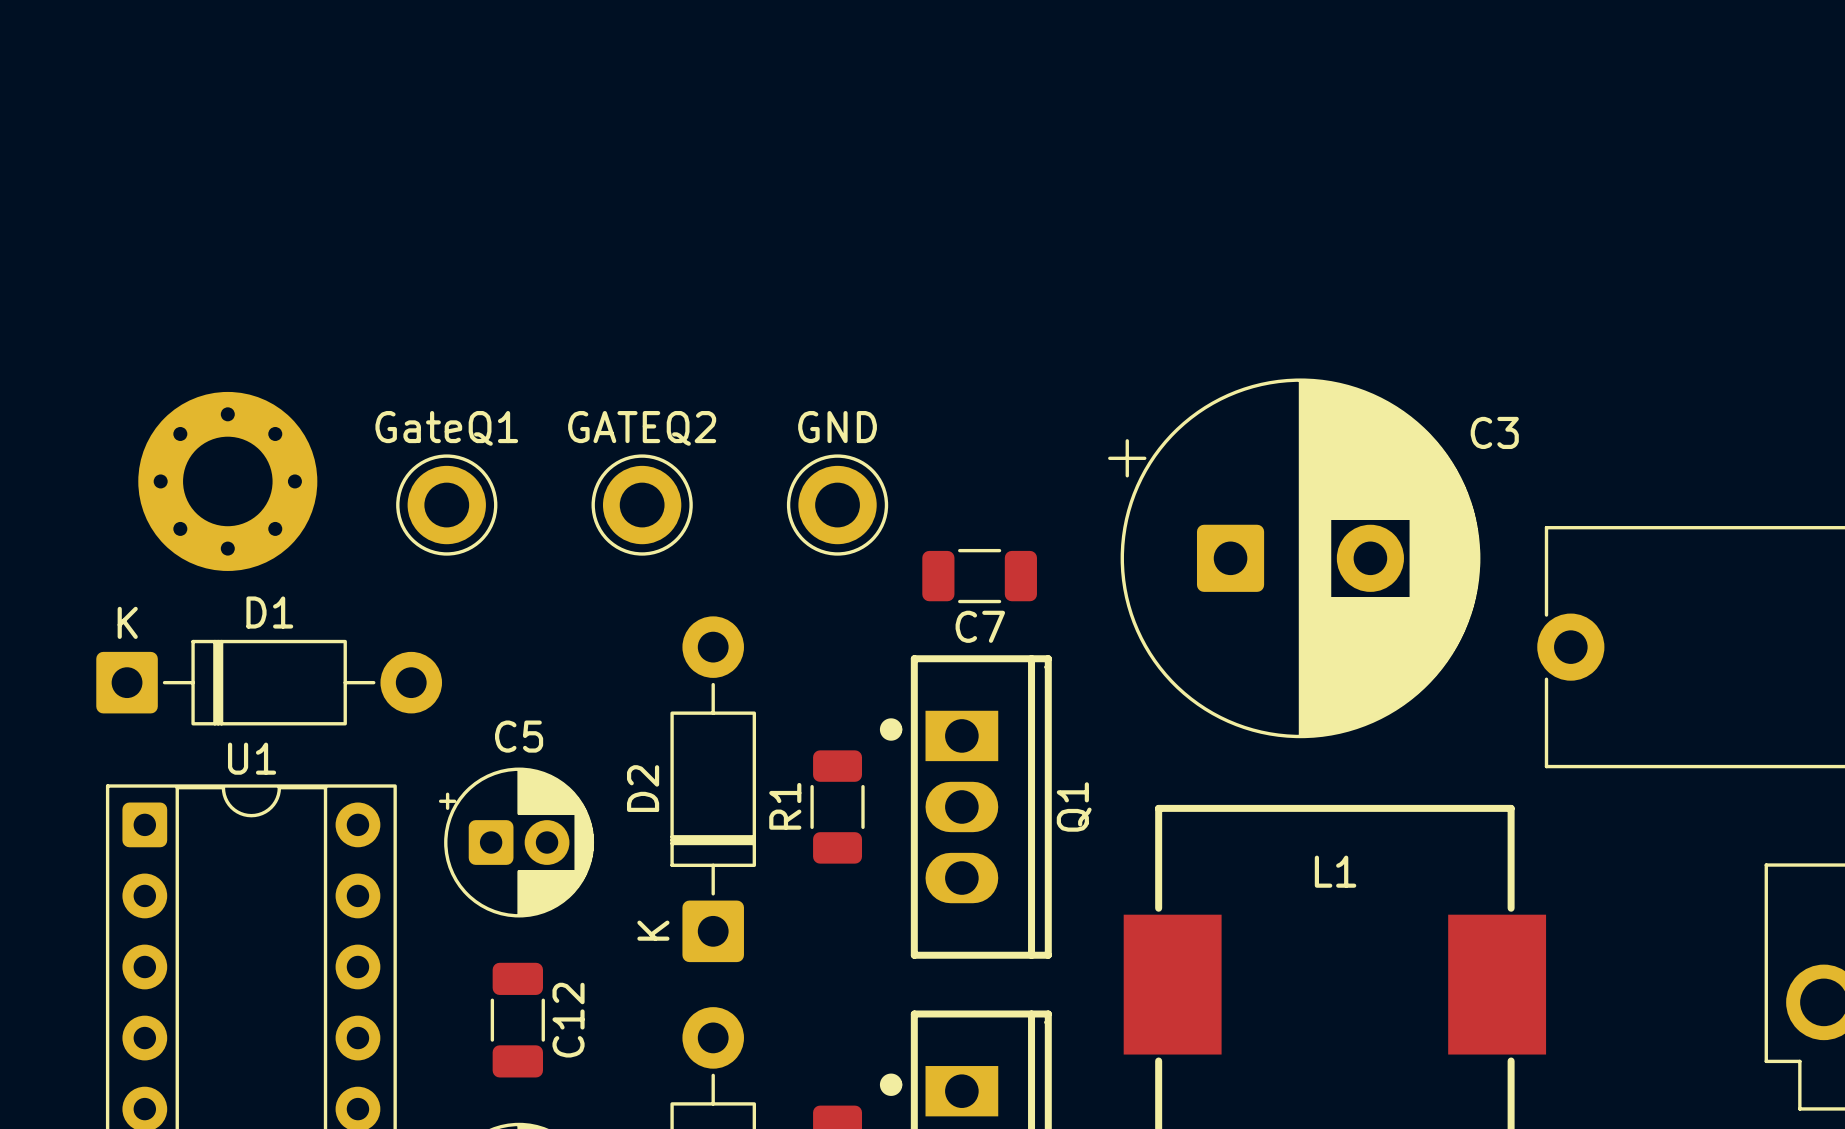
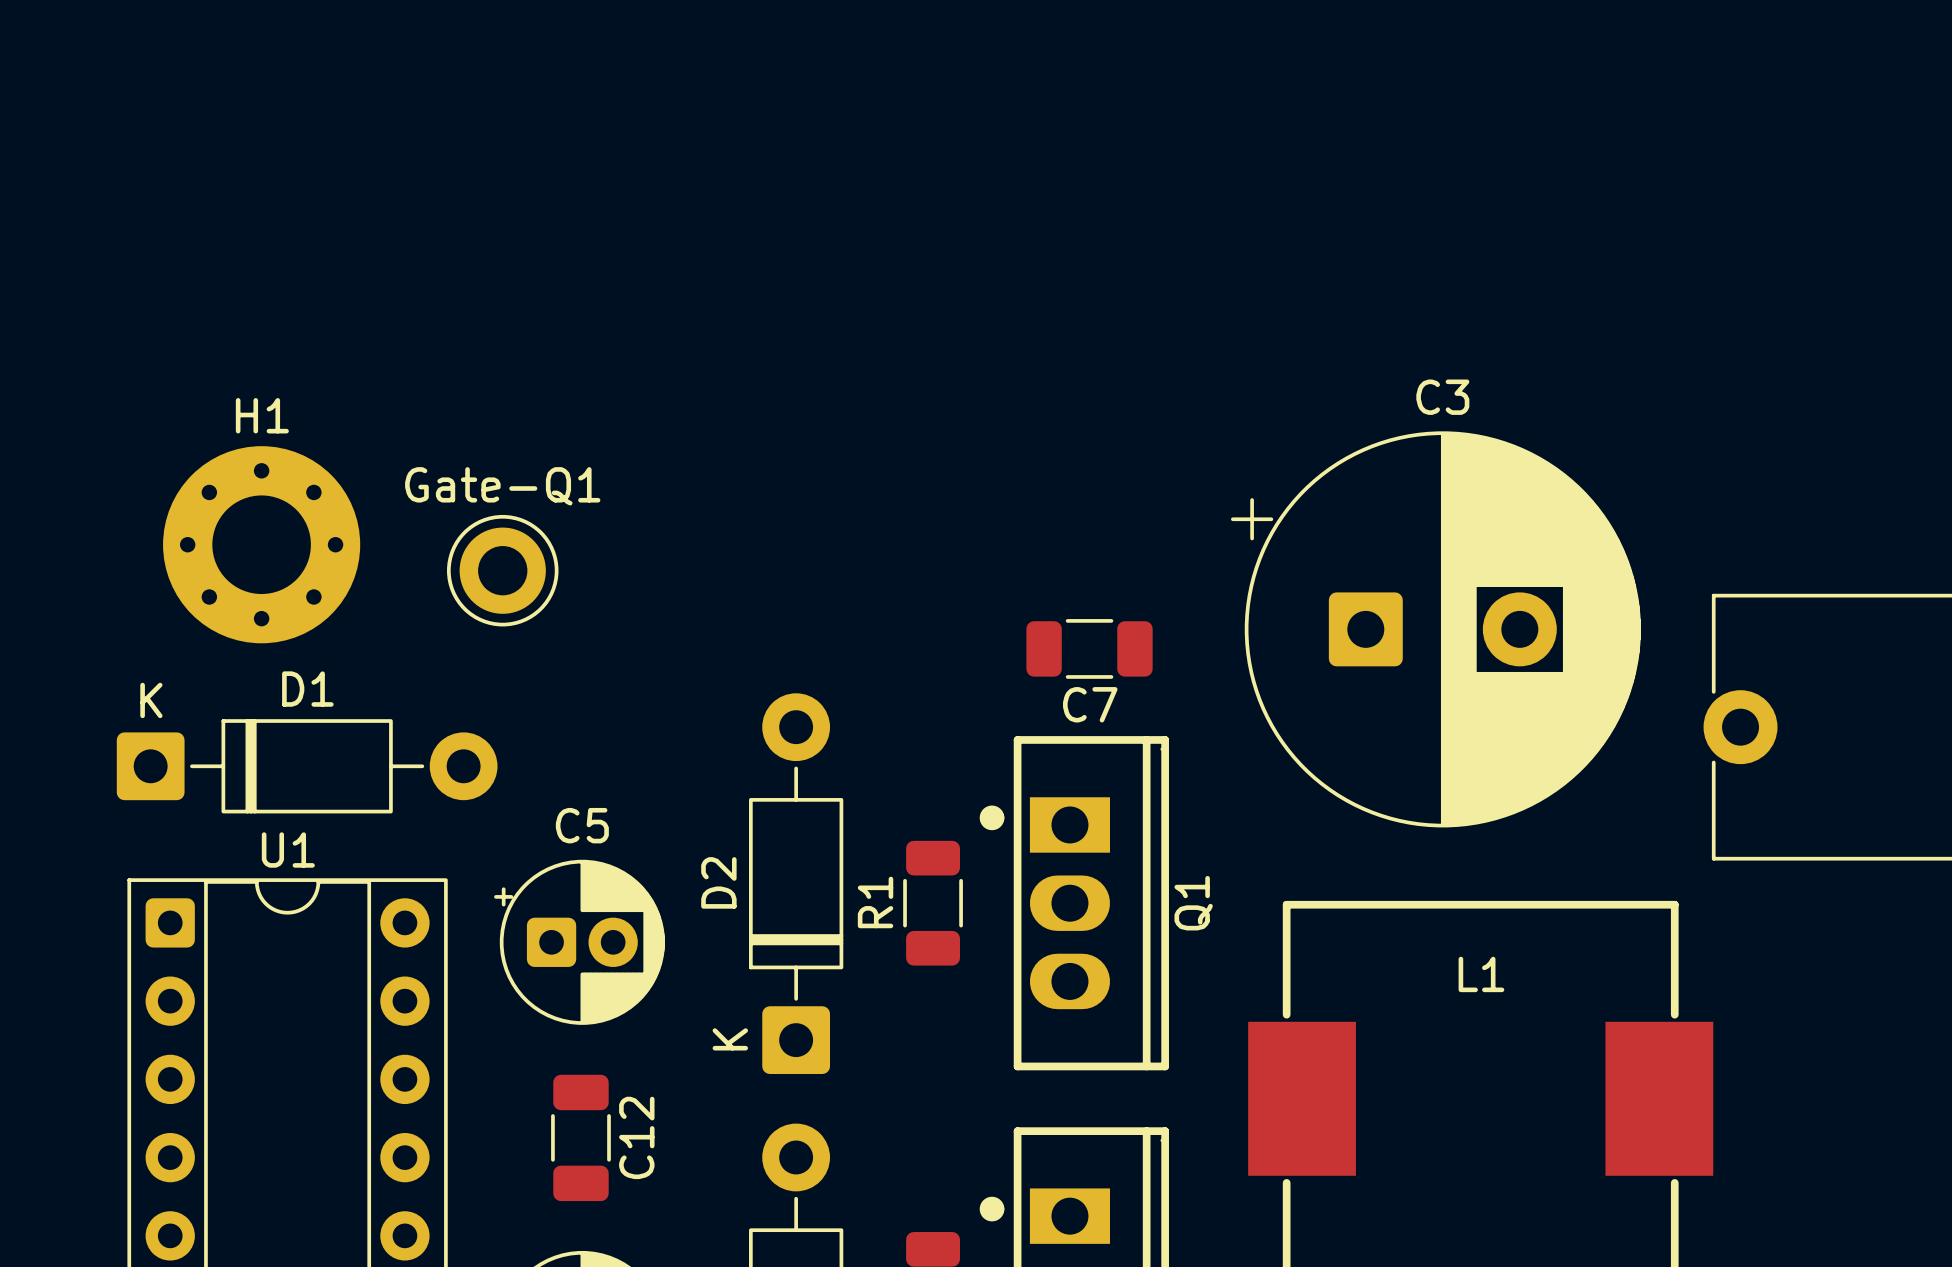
H1 name: none -> H1 (262, 415)
GateQ1 name: GateQ1 (446, 428) -> Gate-Q1 (502, 486)
C3 name position: C3 (1494, 432) -> C3 (1442, 397)
GATEQ2: (642, 505) -> none
GND: (837, 505) -> none

